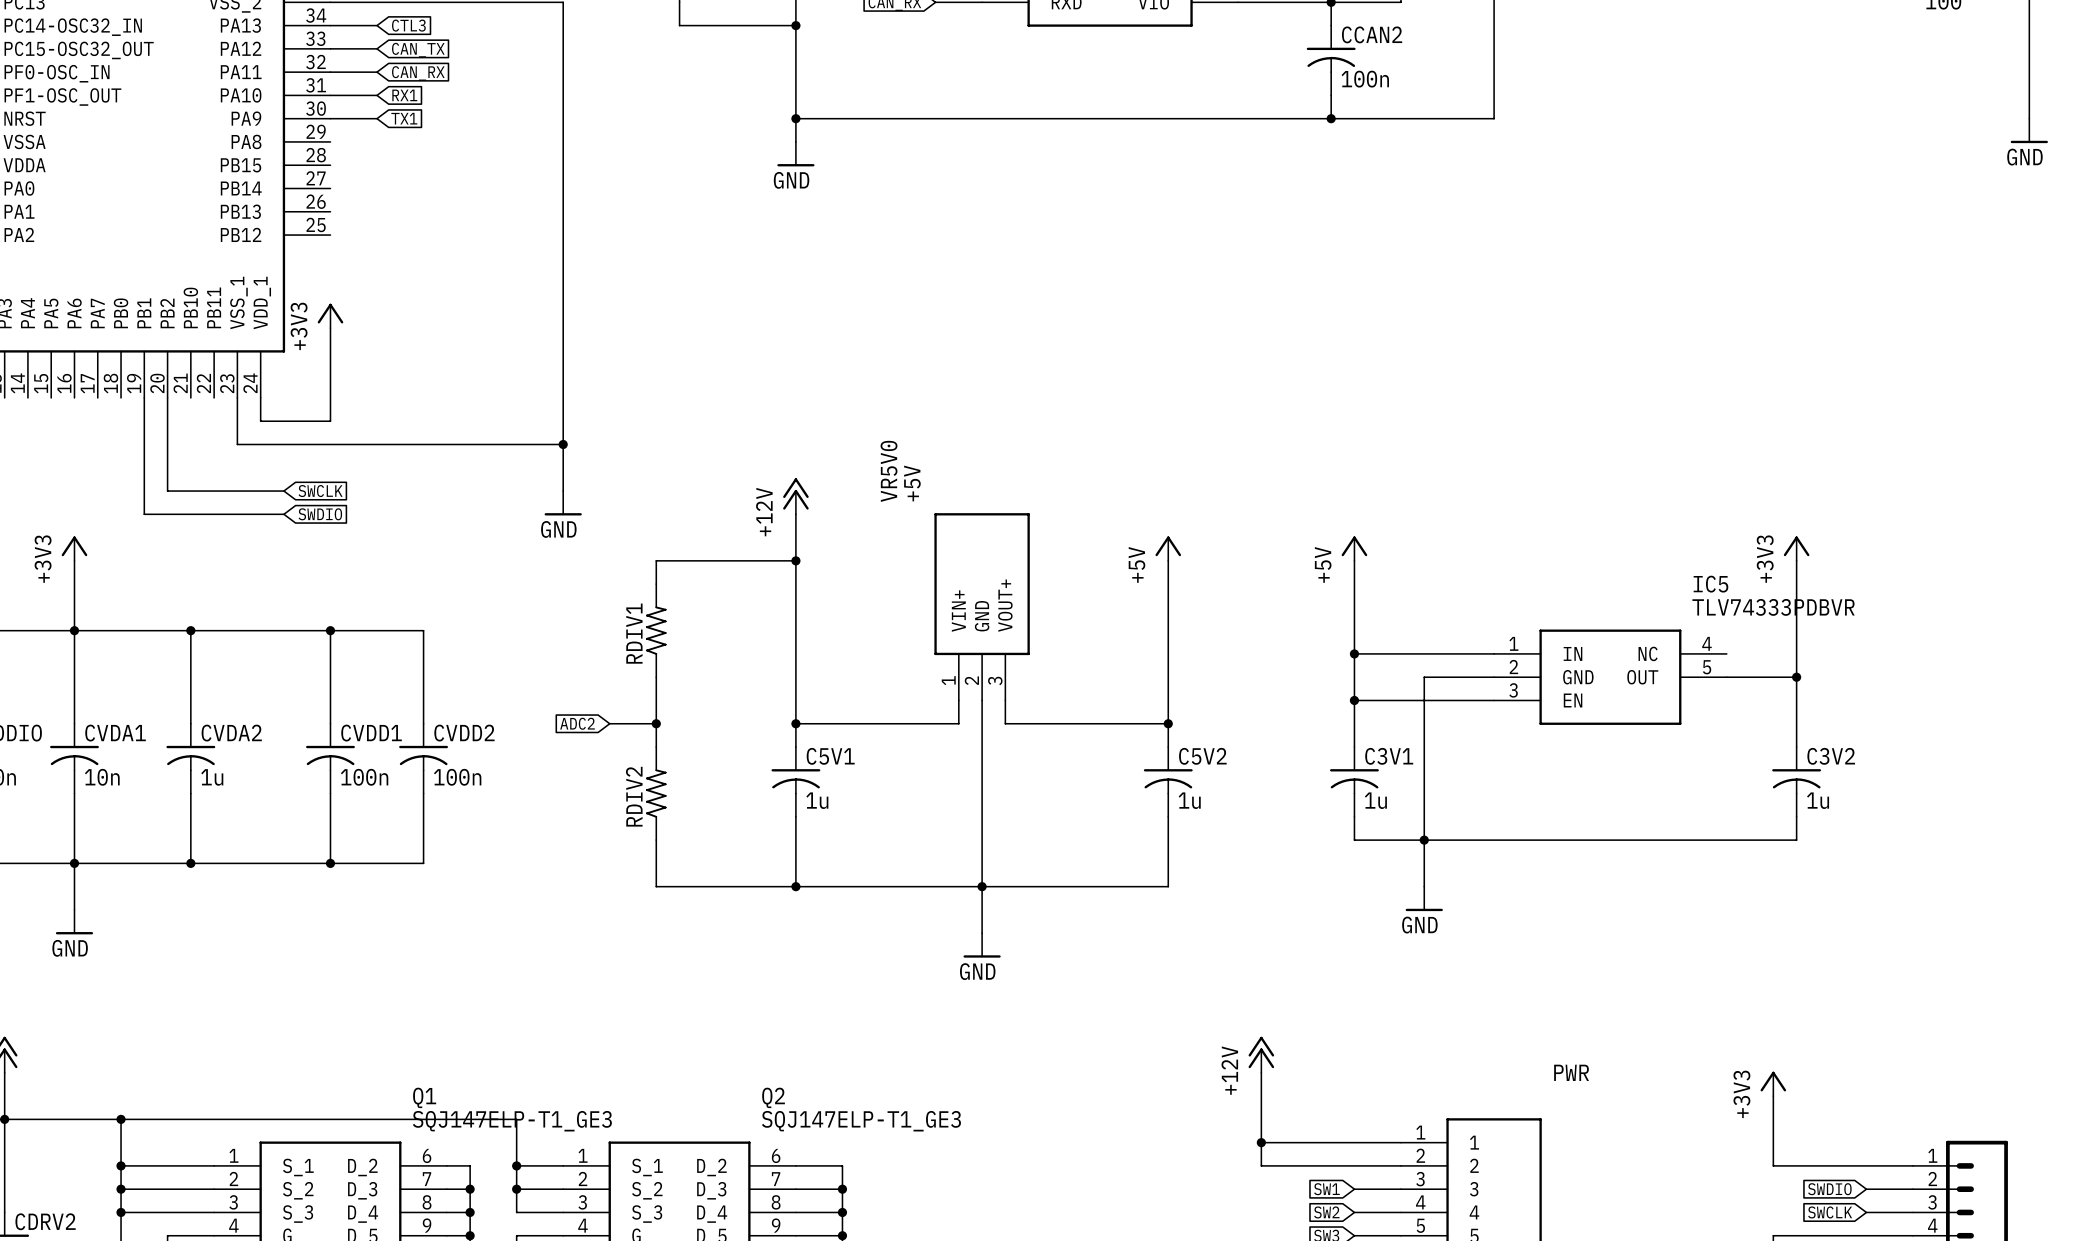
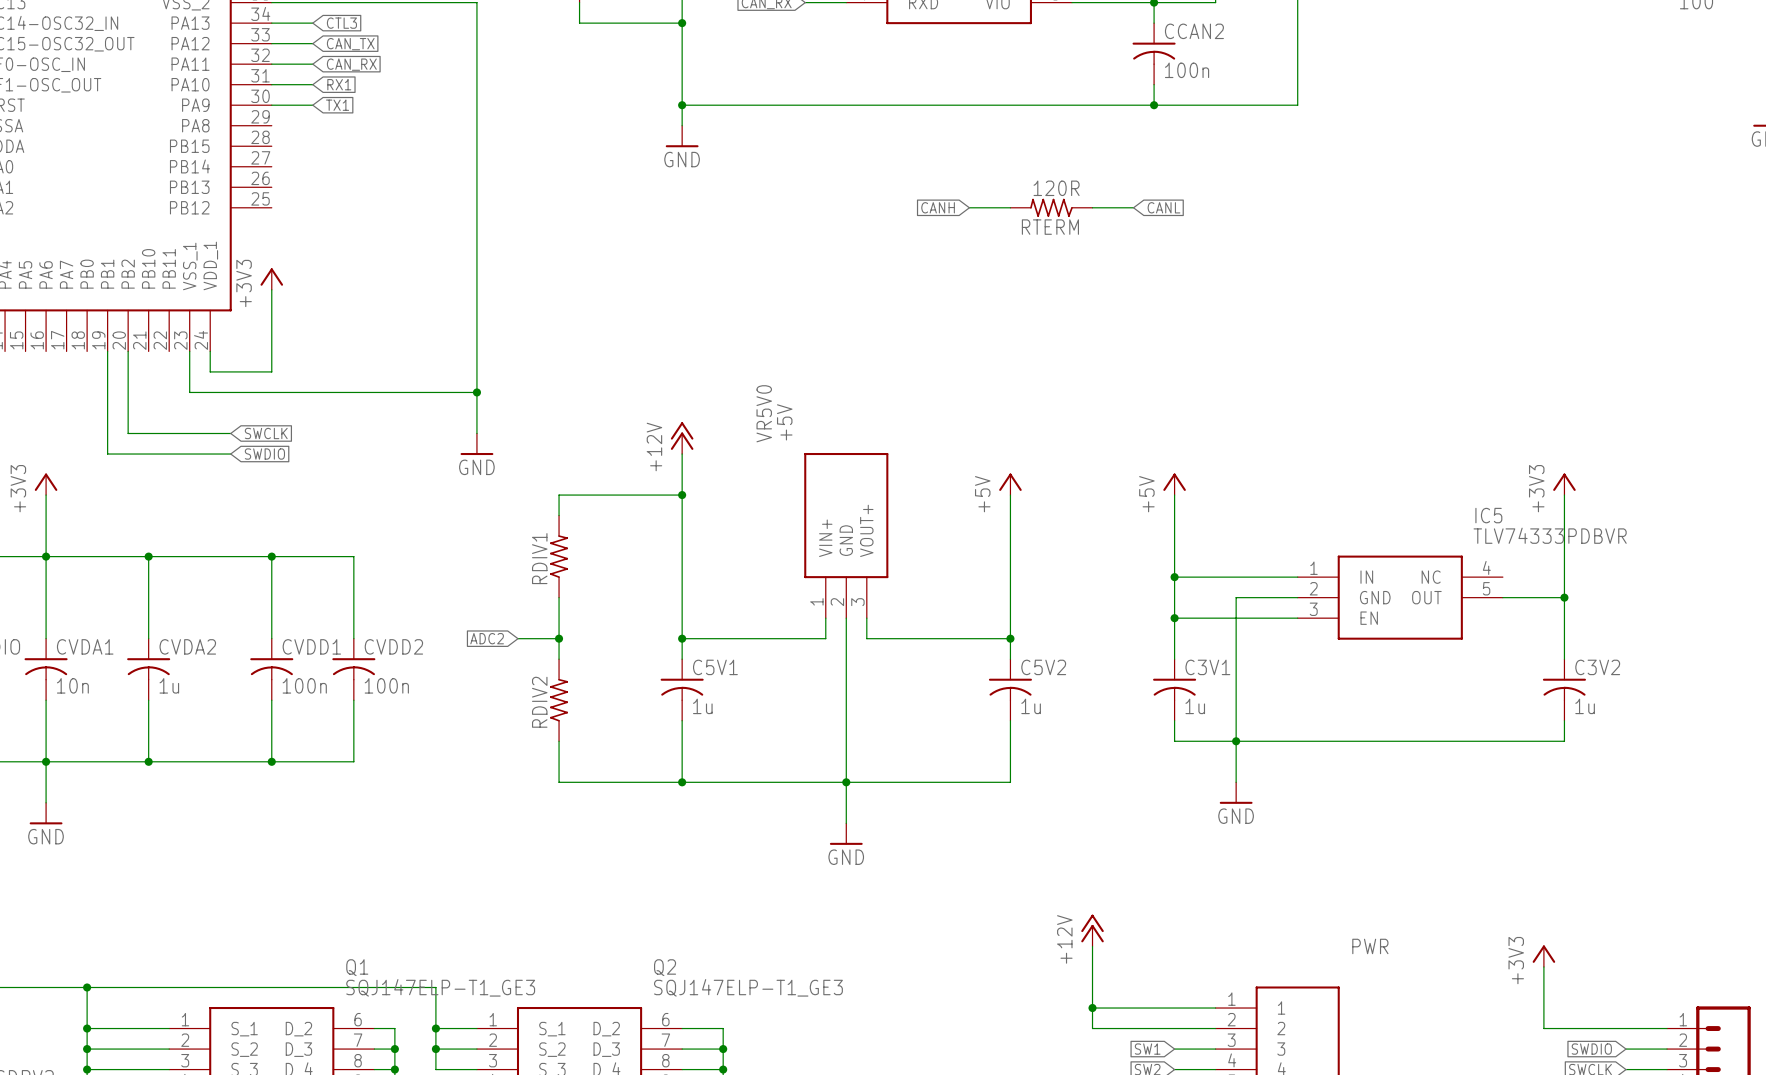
global label: none -> CANH (938, 207)
wire: none -> (969, 207) (1010, 207)
RTERM: none -> 120R (1051, 207)
wire: none -> (1092, 207) (1133, 207)
global label: none -> CANL (1163, 207)

